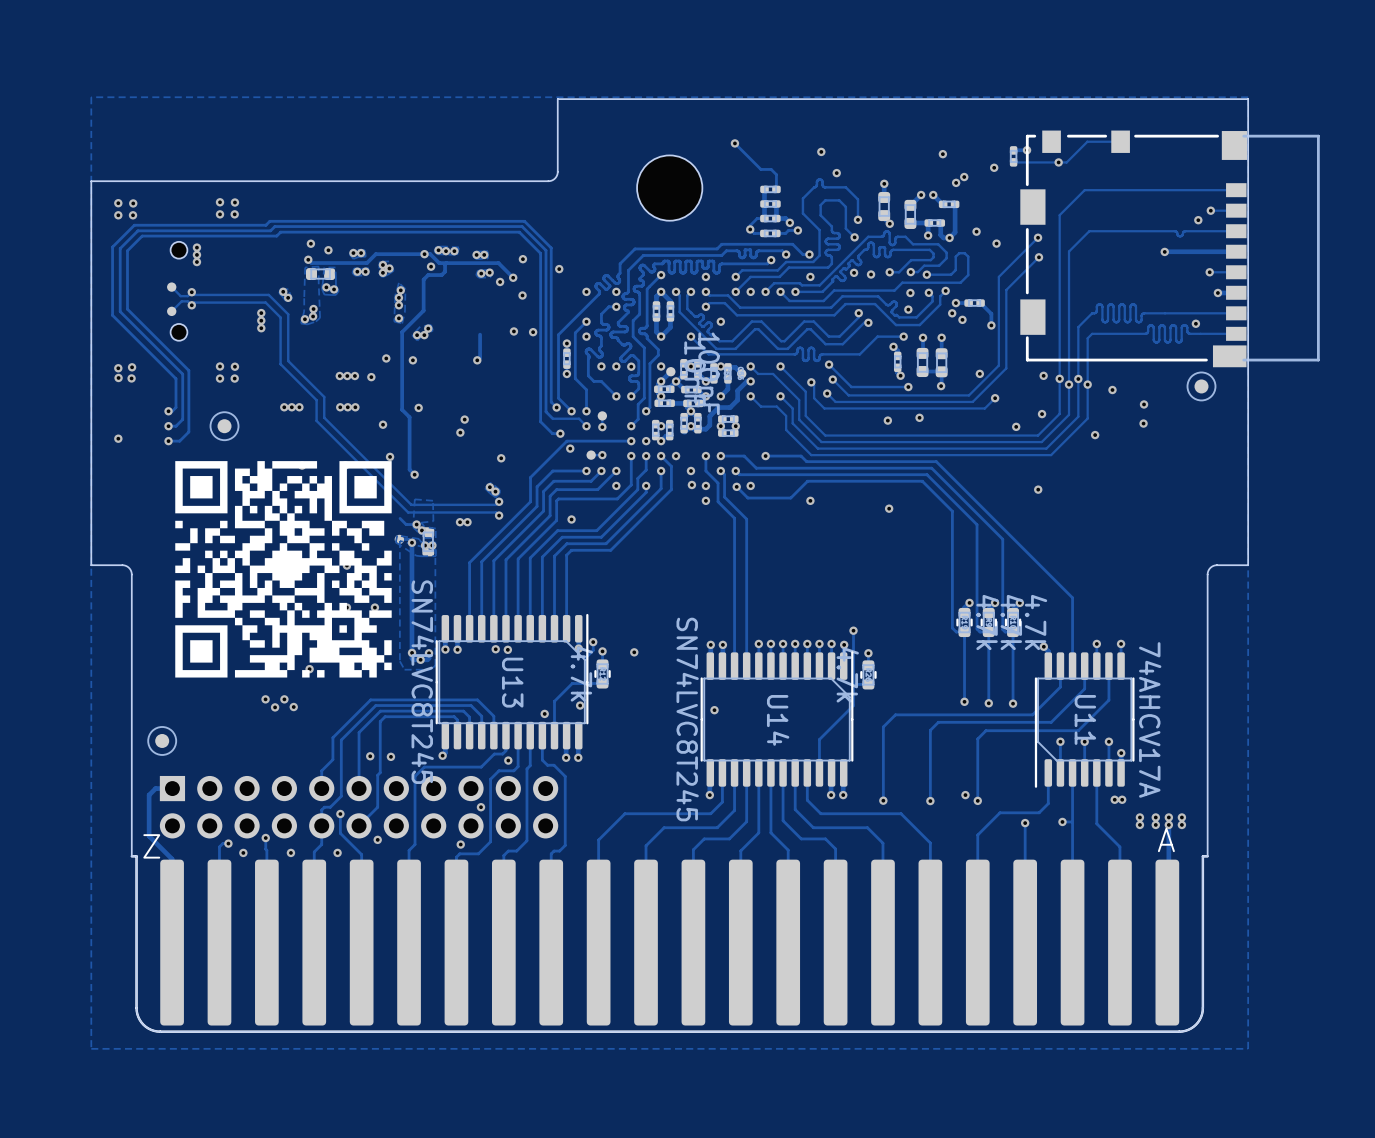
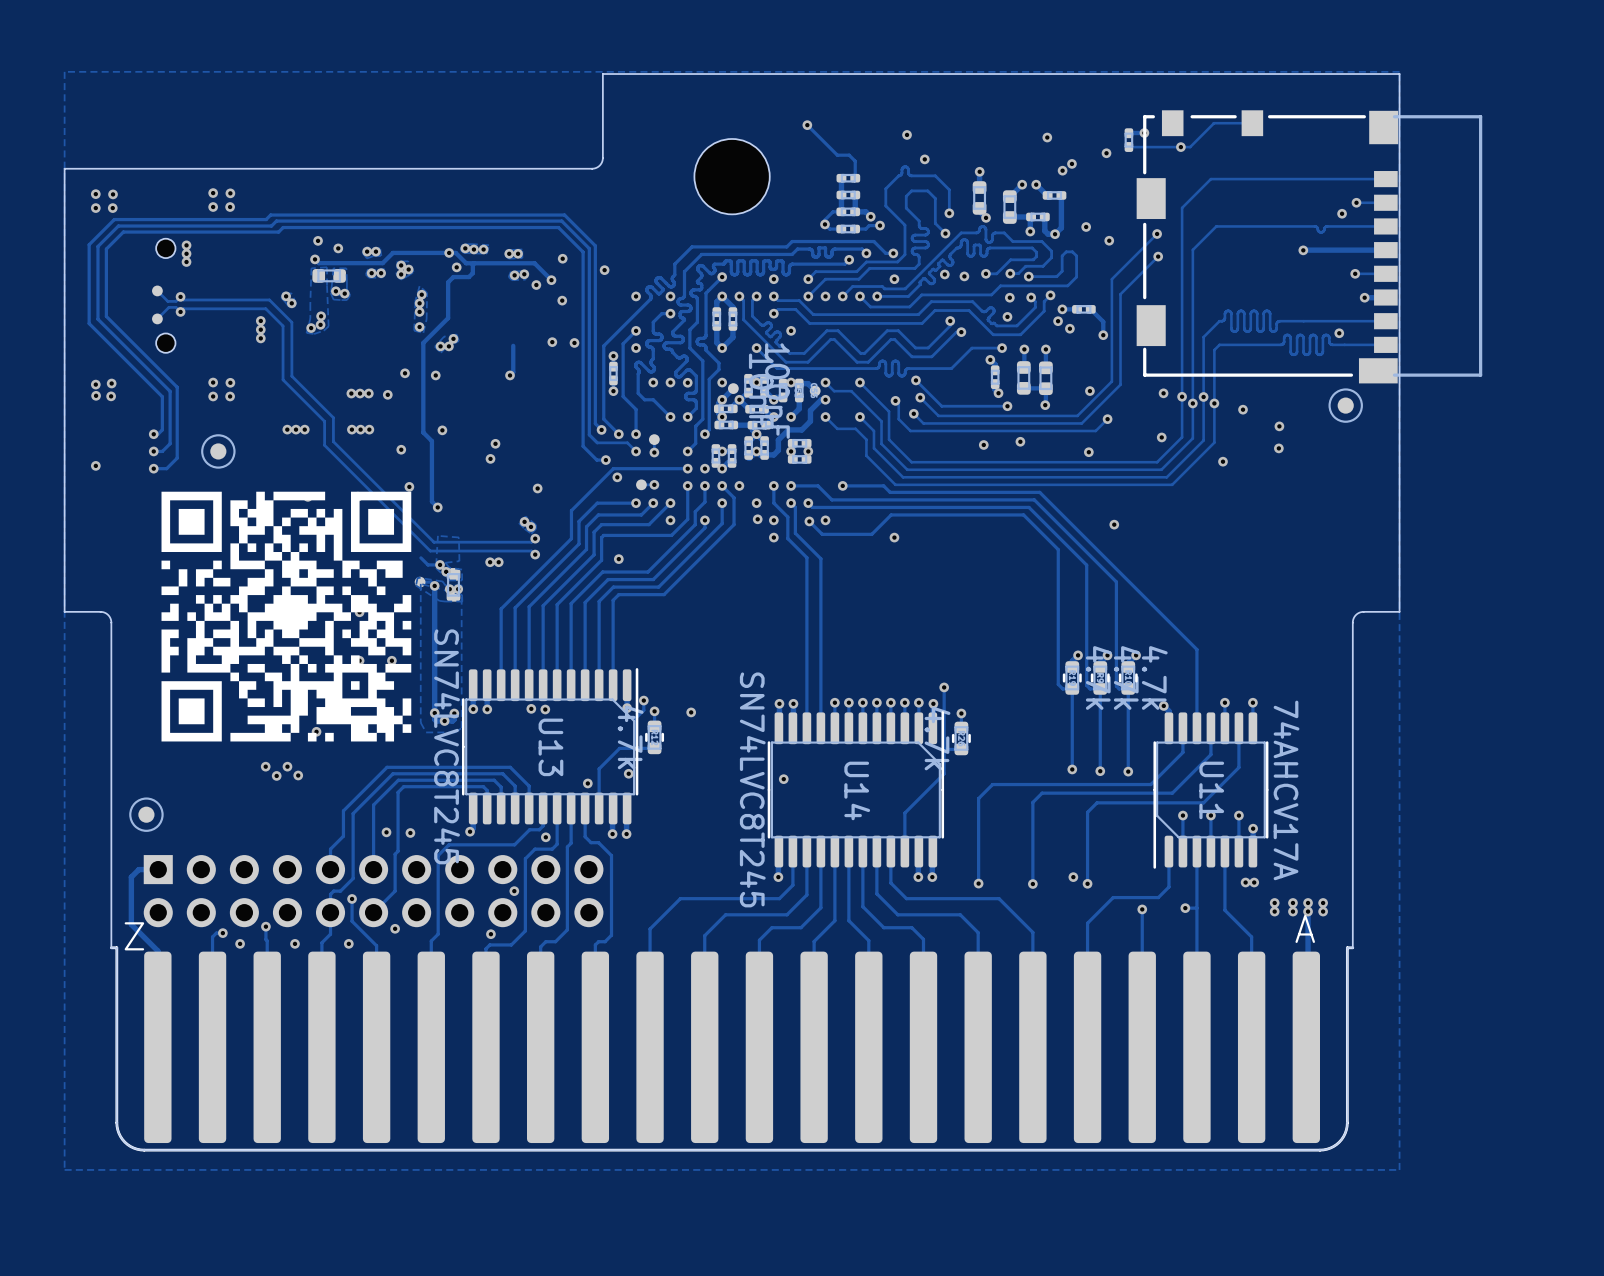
via: none -> (1088, 452)
via: (1016, 426) -> none
via: none -> (1114, 524)
via: (1038, 489) -> none
via: (889, 508) -> none

